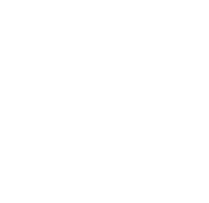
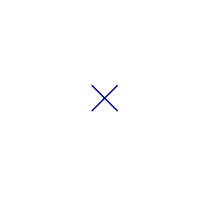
no-connect mark: none -> (104, 98)

